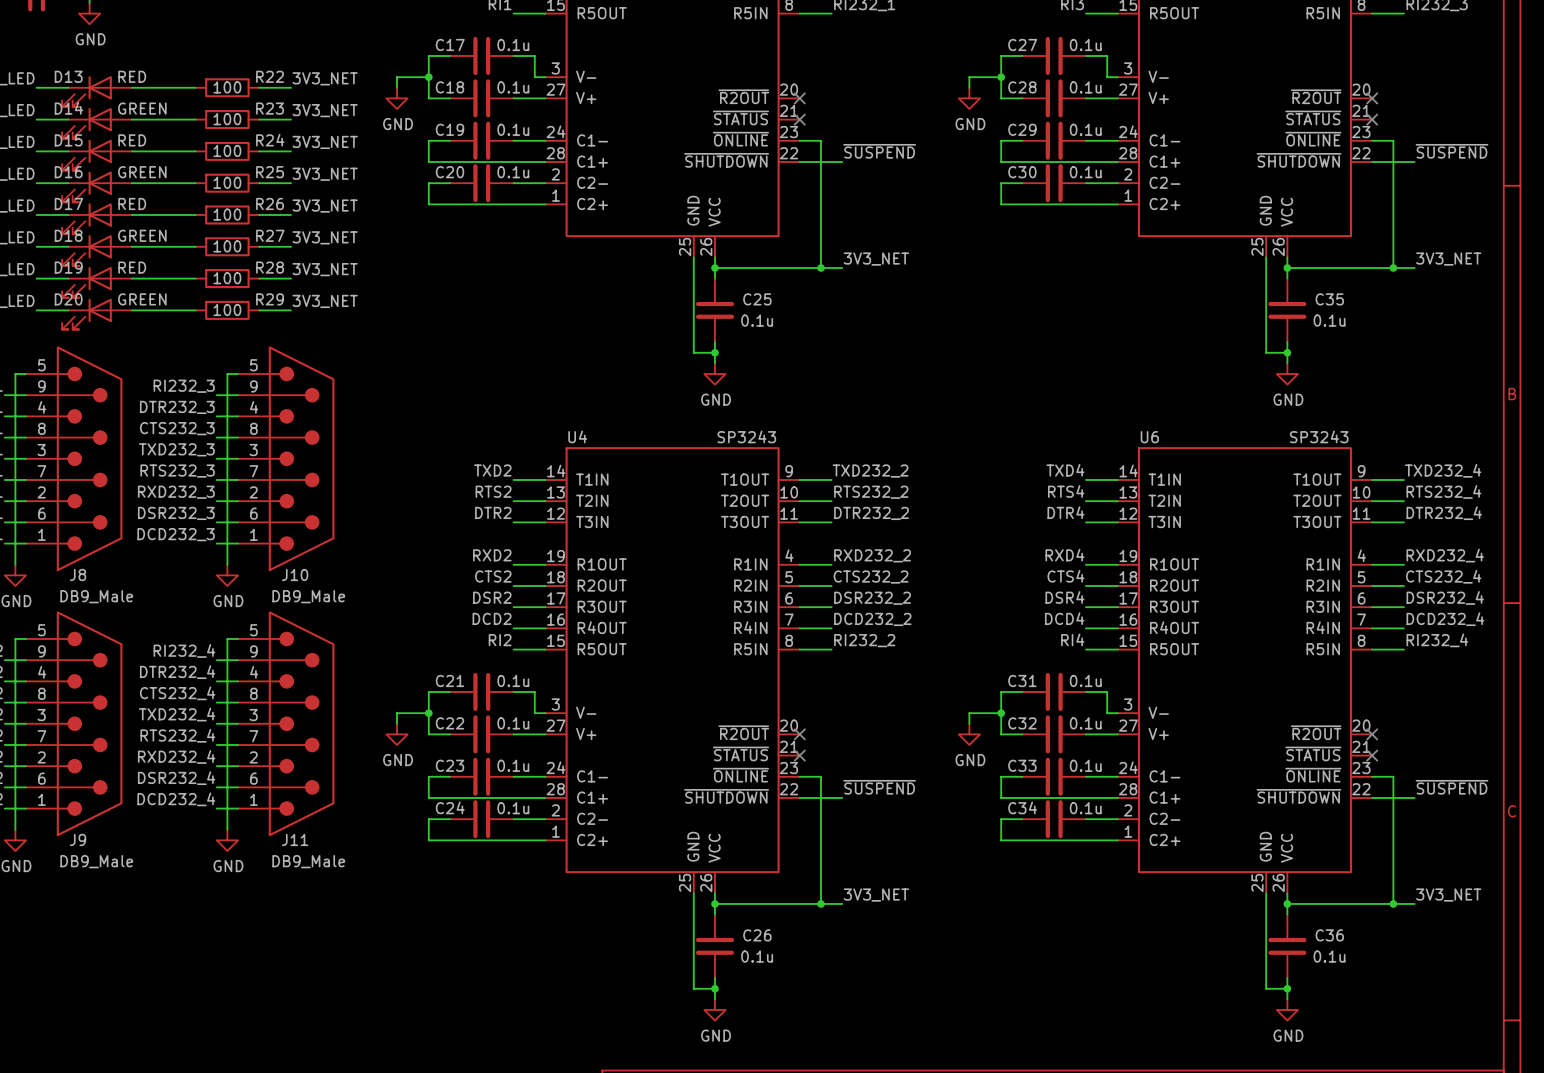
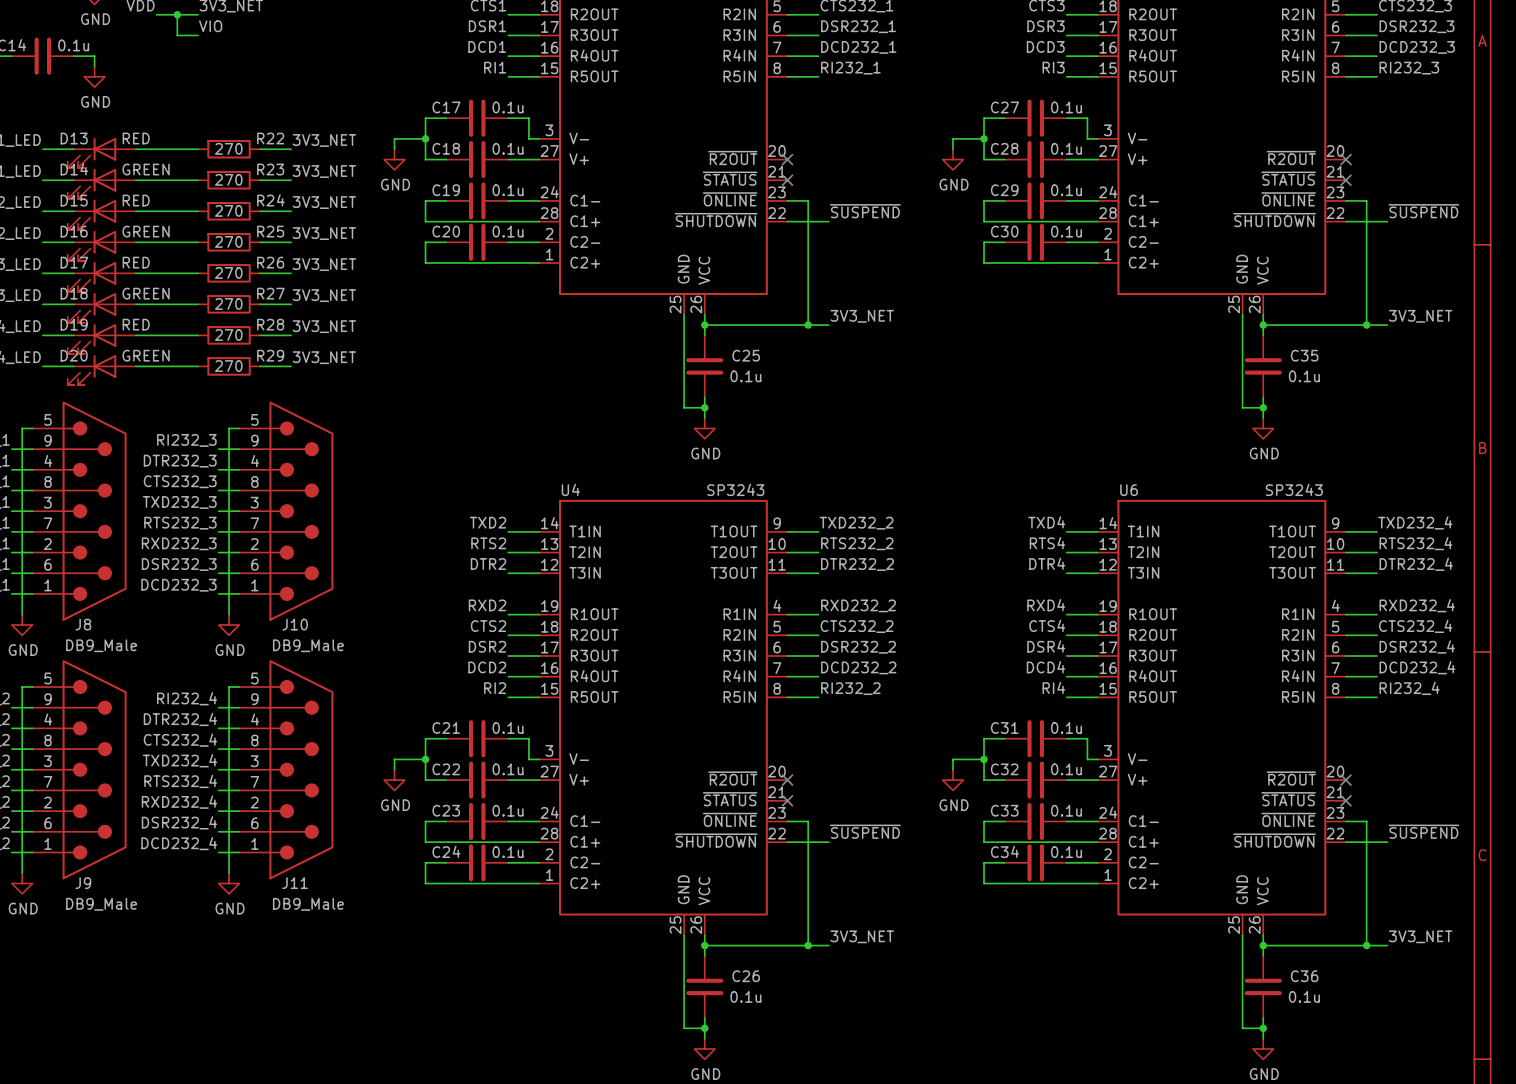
R22 value: 100 (227, 87) -> 270 (228, 148)
R23 value: 100 (227, 119) -> 270 (228, 179)
R24 value: 100 (227, 150) -> 270 (228, 210)
R25 value: 100 (227, 182) -> 270 (228, 241)
R26 value: 100 (227, 214) -> 270 (228, 272)
R27 value: 100 (227, 246) -> 270 (228, 303)
R28 value: 100 (227, 278) -> 270 (228, 335)
R29 value: 100 (227, 309) -> 270 (228, 366)

